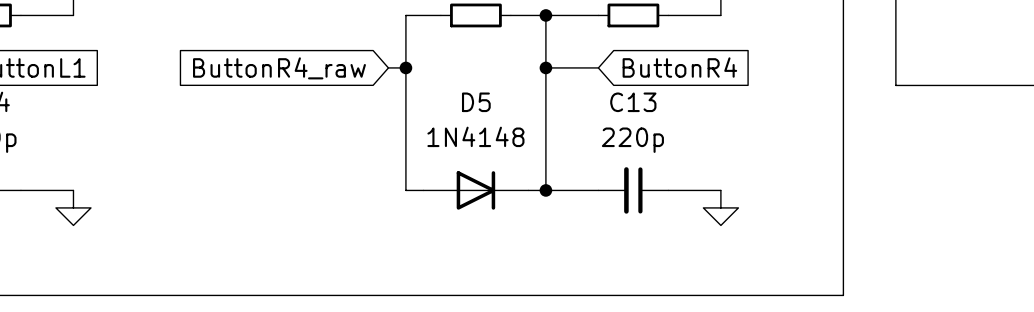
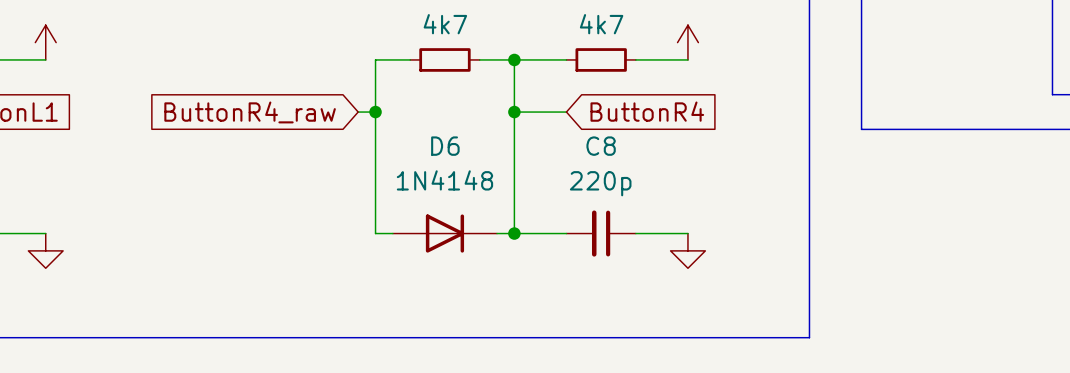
D5 name: D5 (476, 102) -> D6 (445, 146)
C13 name: C13 (633, 102) -> C8 (601, 146)

